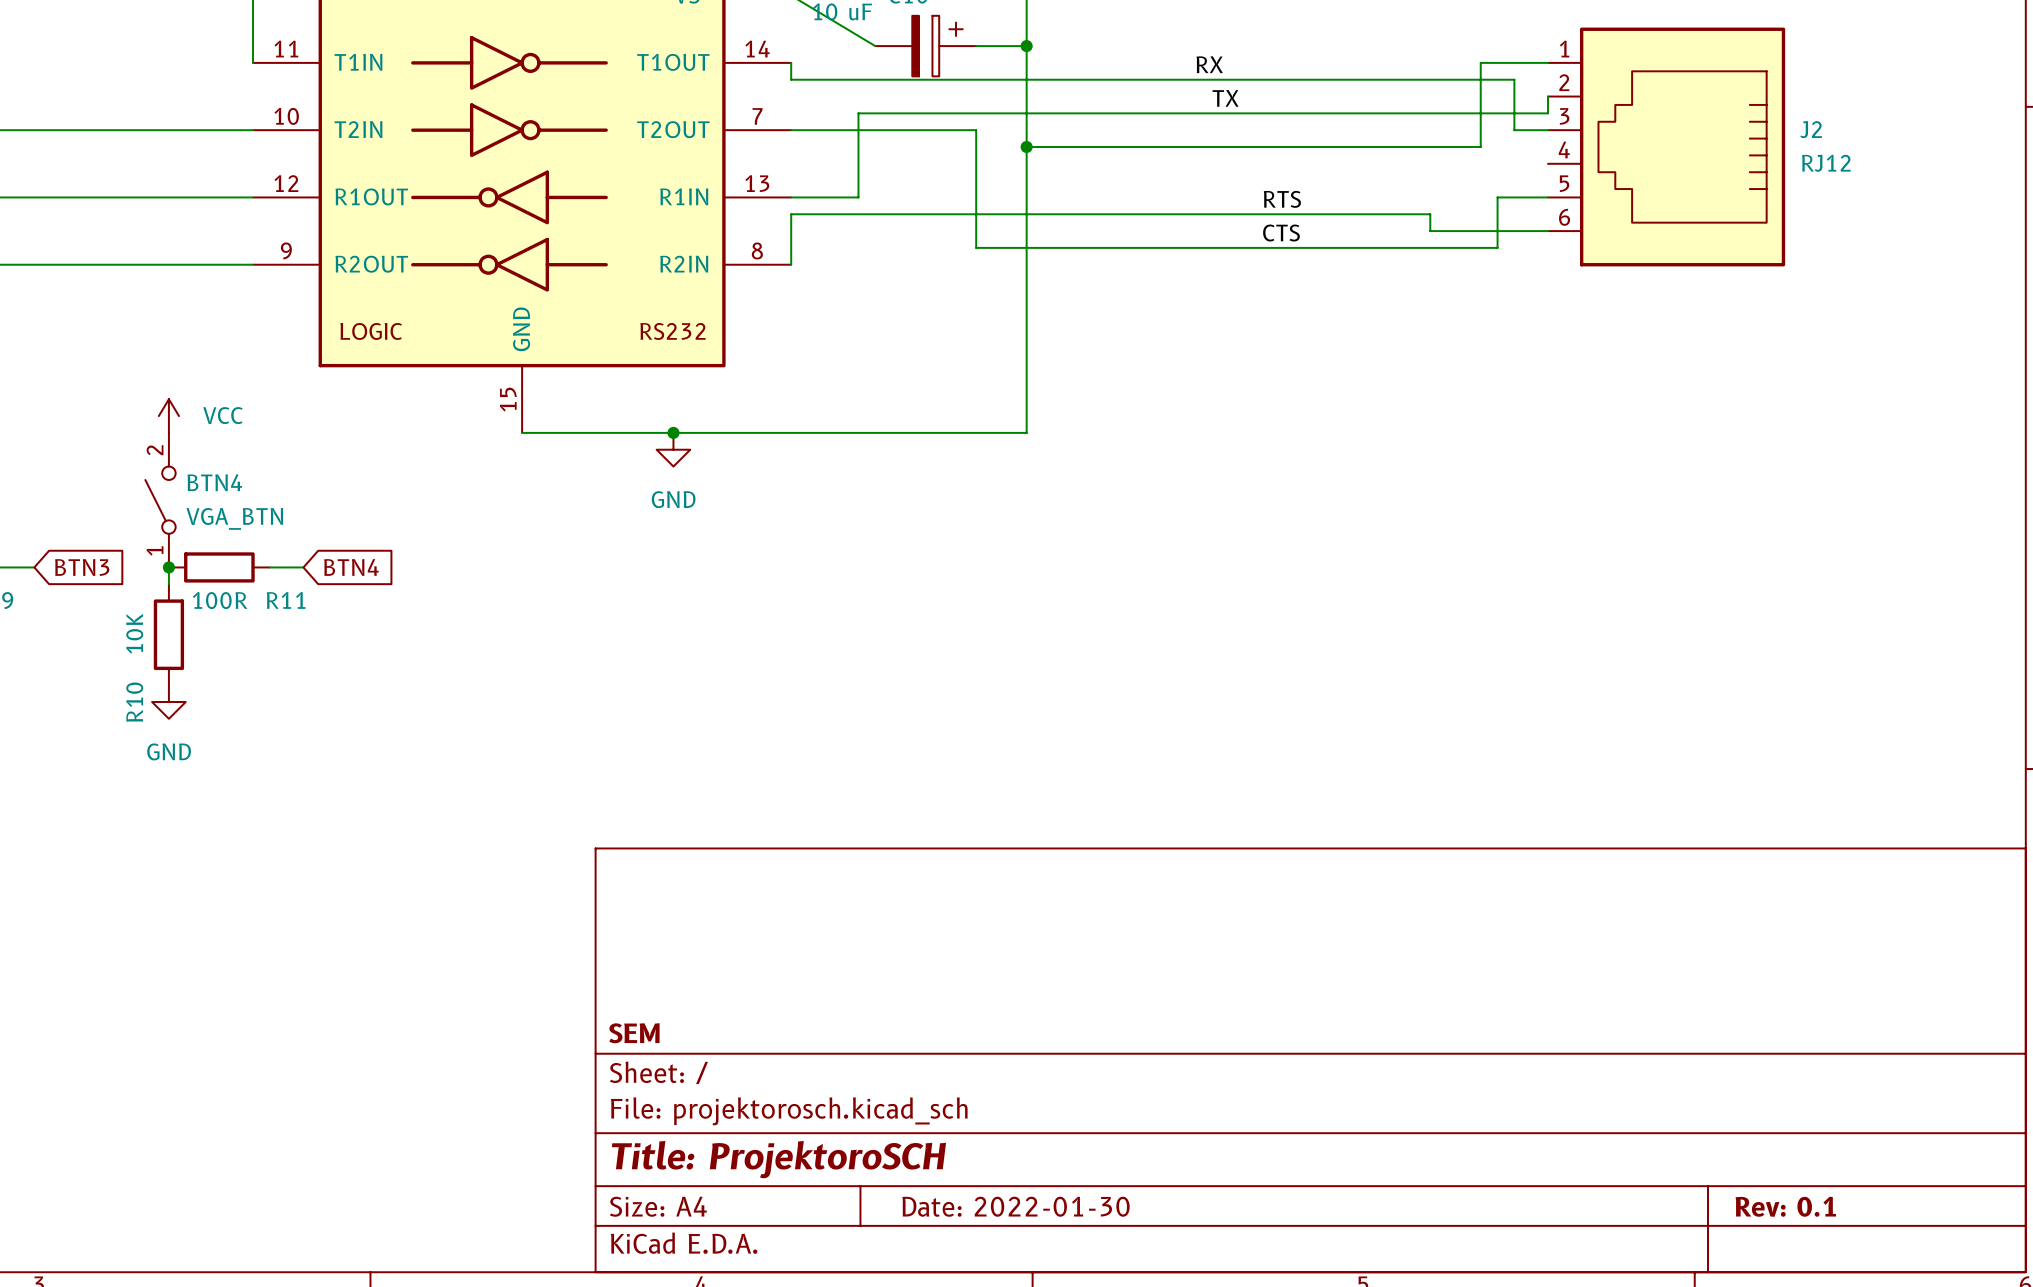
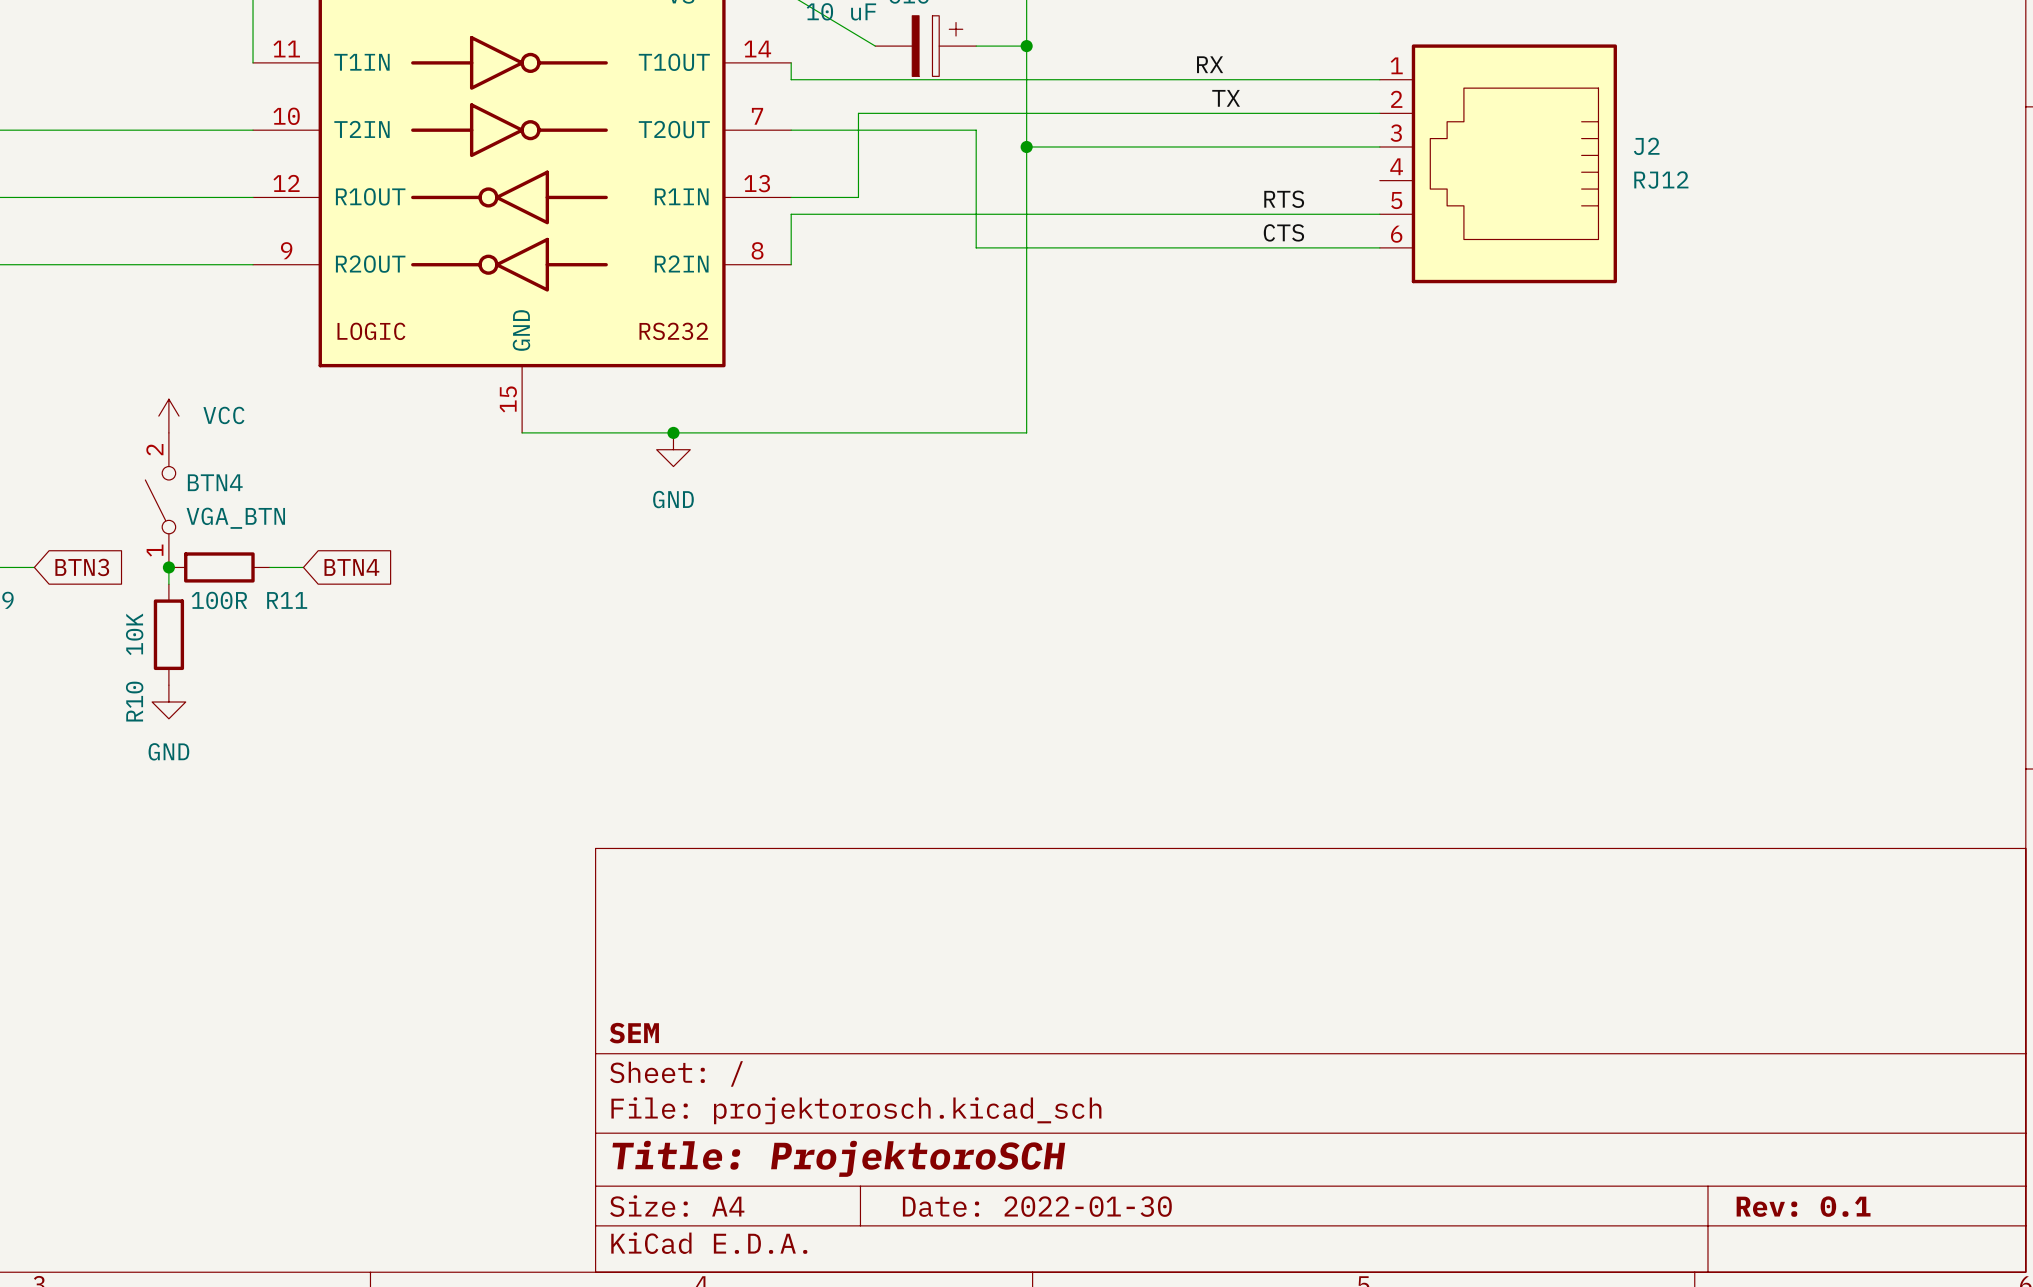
J2 position: (1666, 146) -> (1498, 163)

